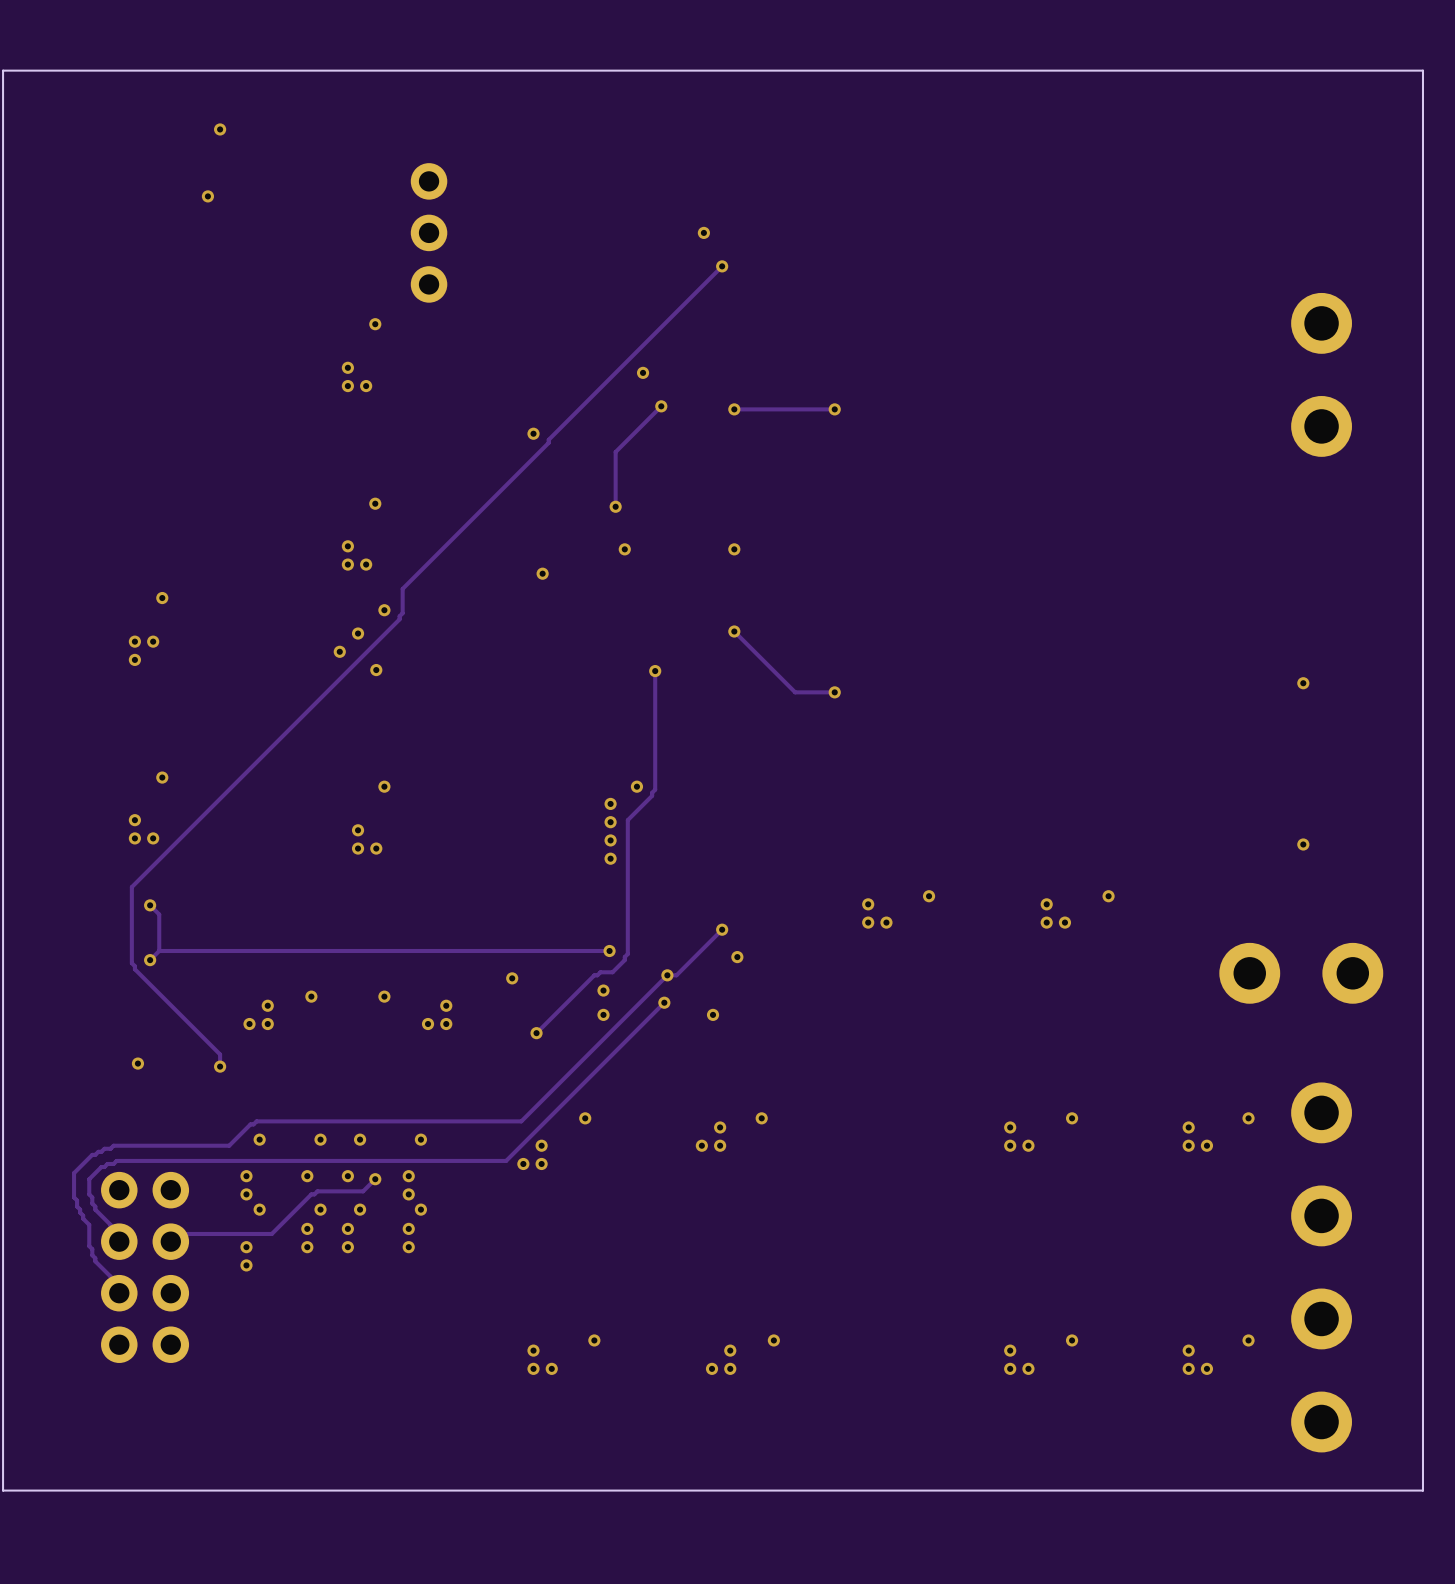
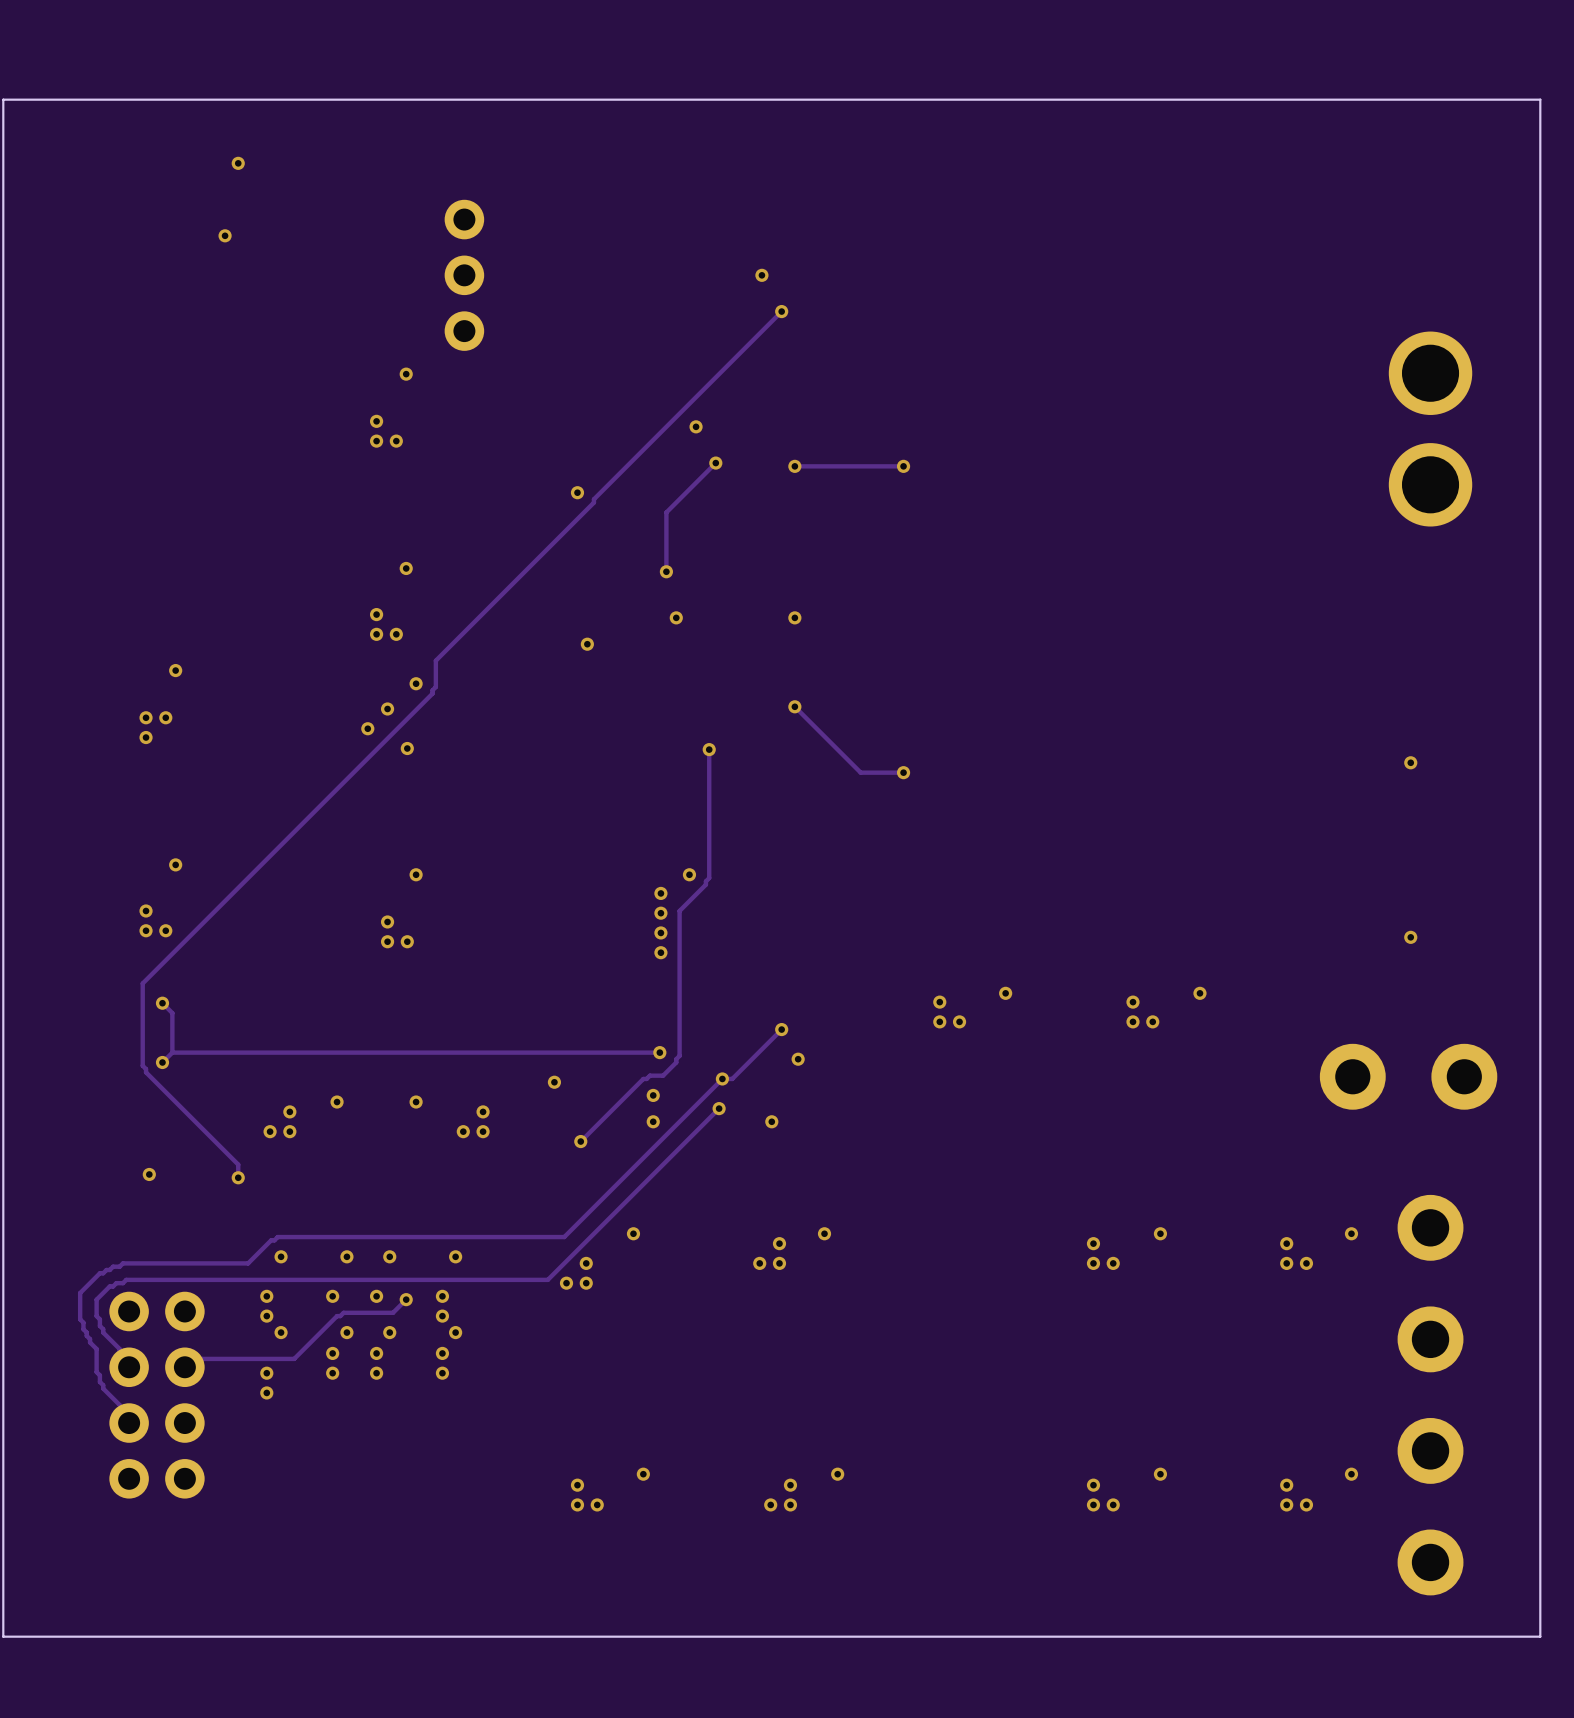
part footprint: [1291, 292, 1352, 457] -> [1388, 331, 1473, 527]

